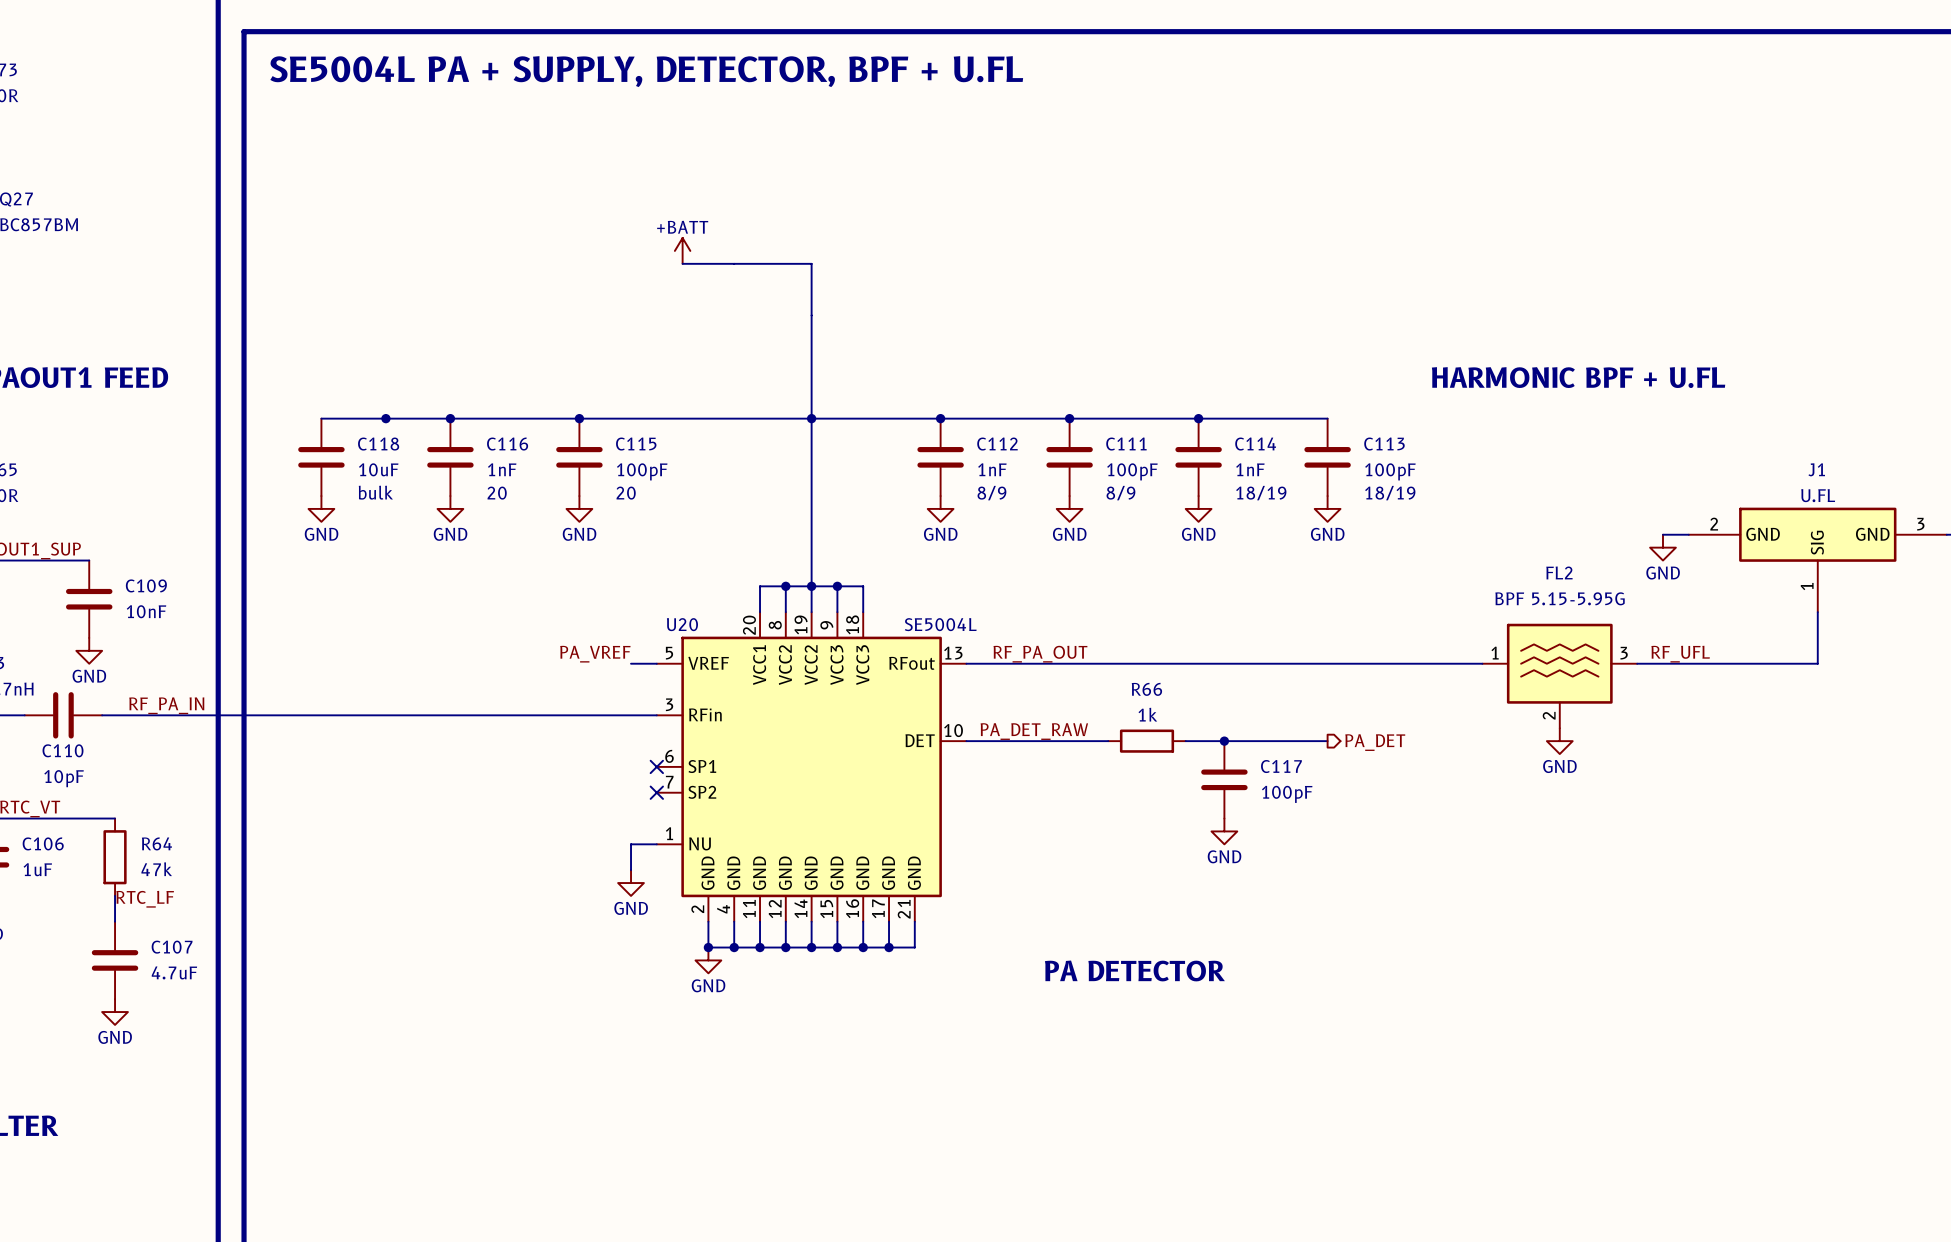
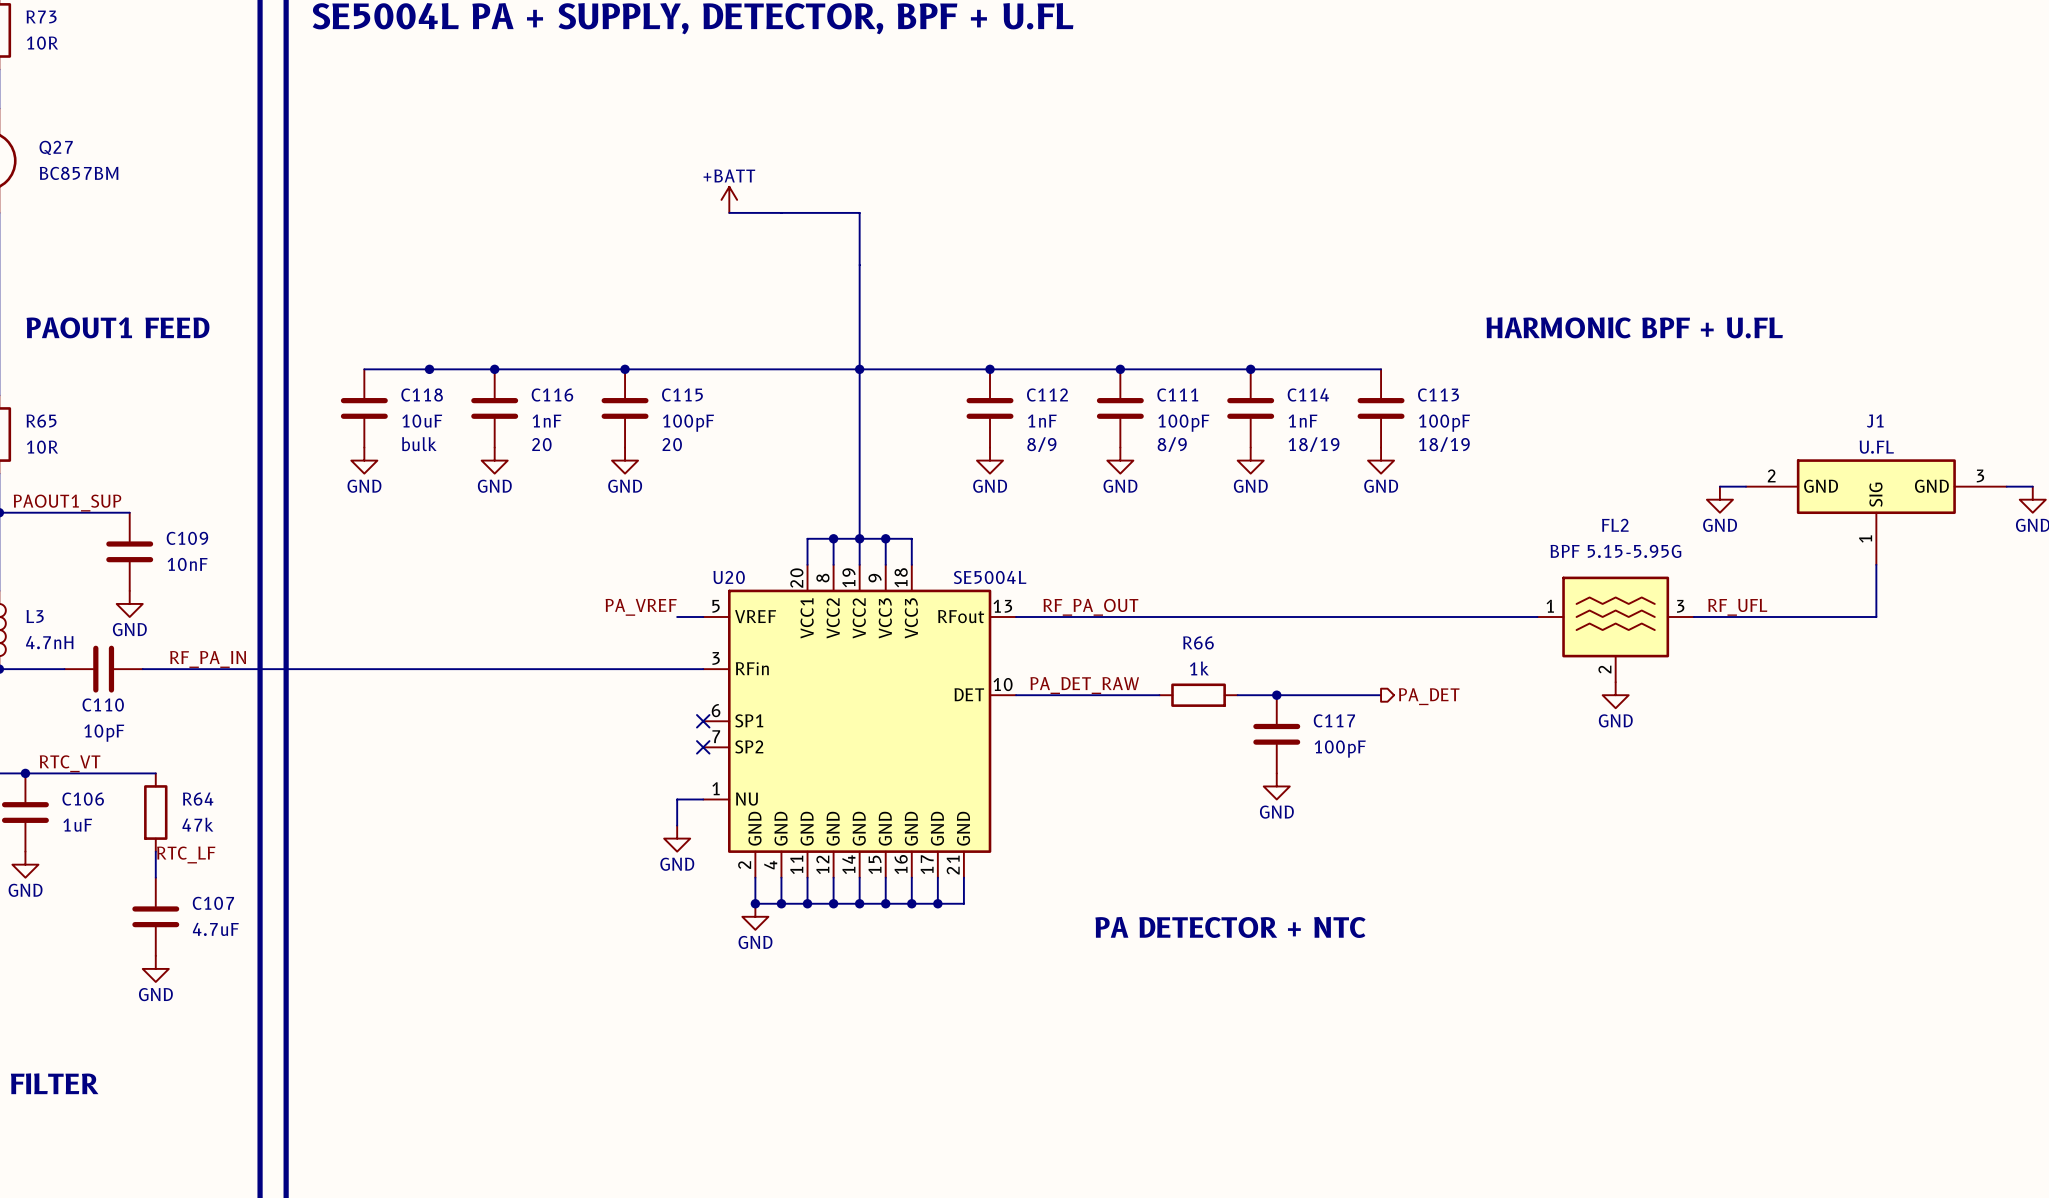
text: PA DETECTOR (1134, 970) -> PA DETECTOR + NTC (1230, 927)

